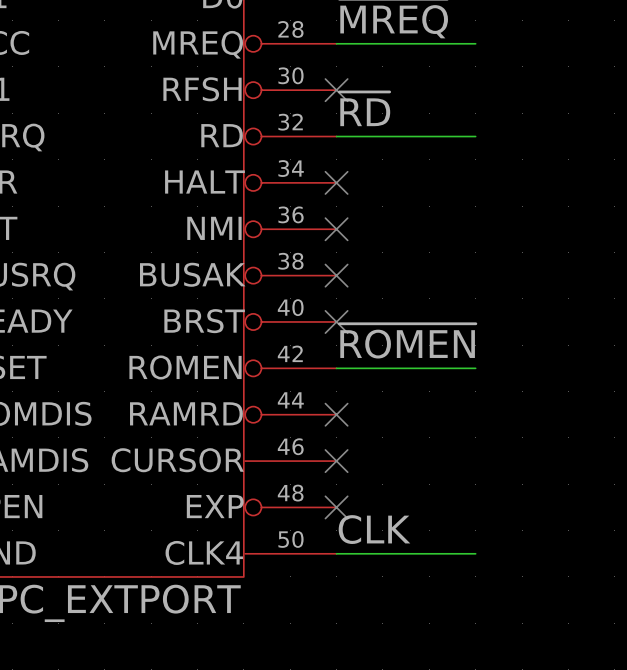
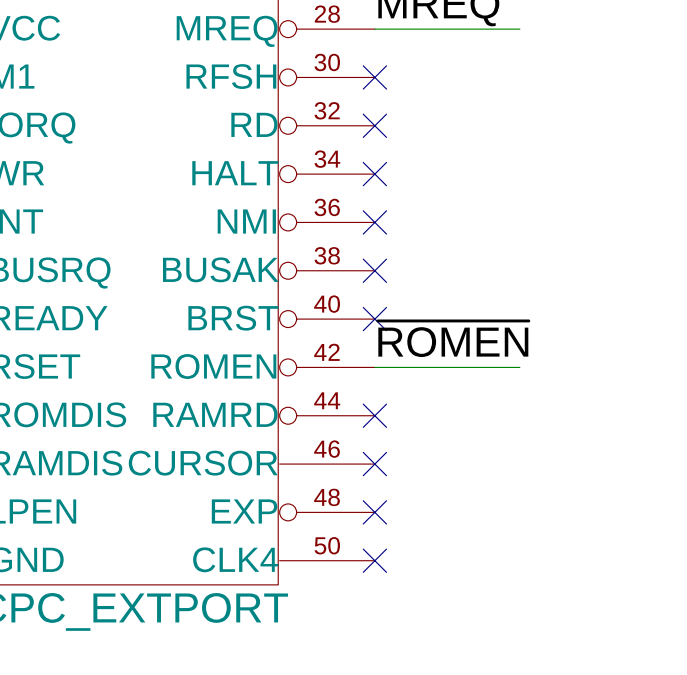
label: ~{RD} (364, 109) -> none
wire: (336, 136) (475, 136) -> none
no-connect mark: none -> (374, 125)
label: CLK (374, 529) -> none
wire: (336, 553) (475, 553) -> none
no-connect mark: none -> (374, 560)

